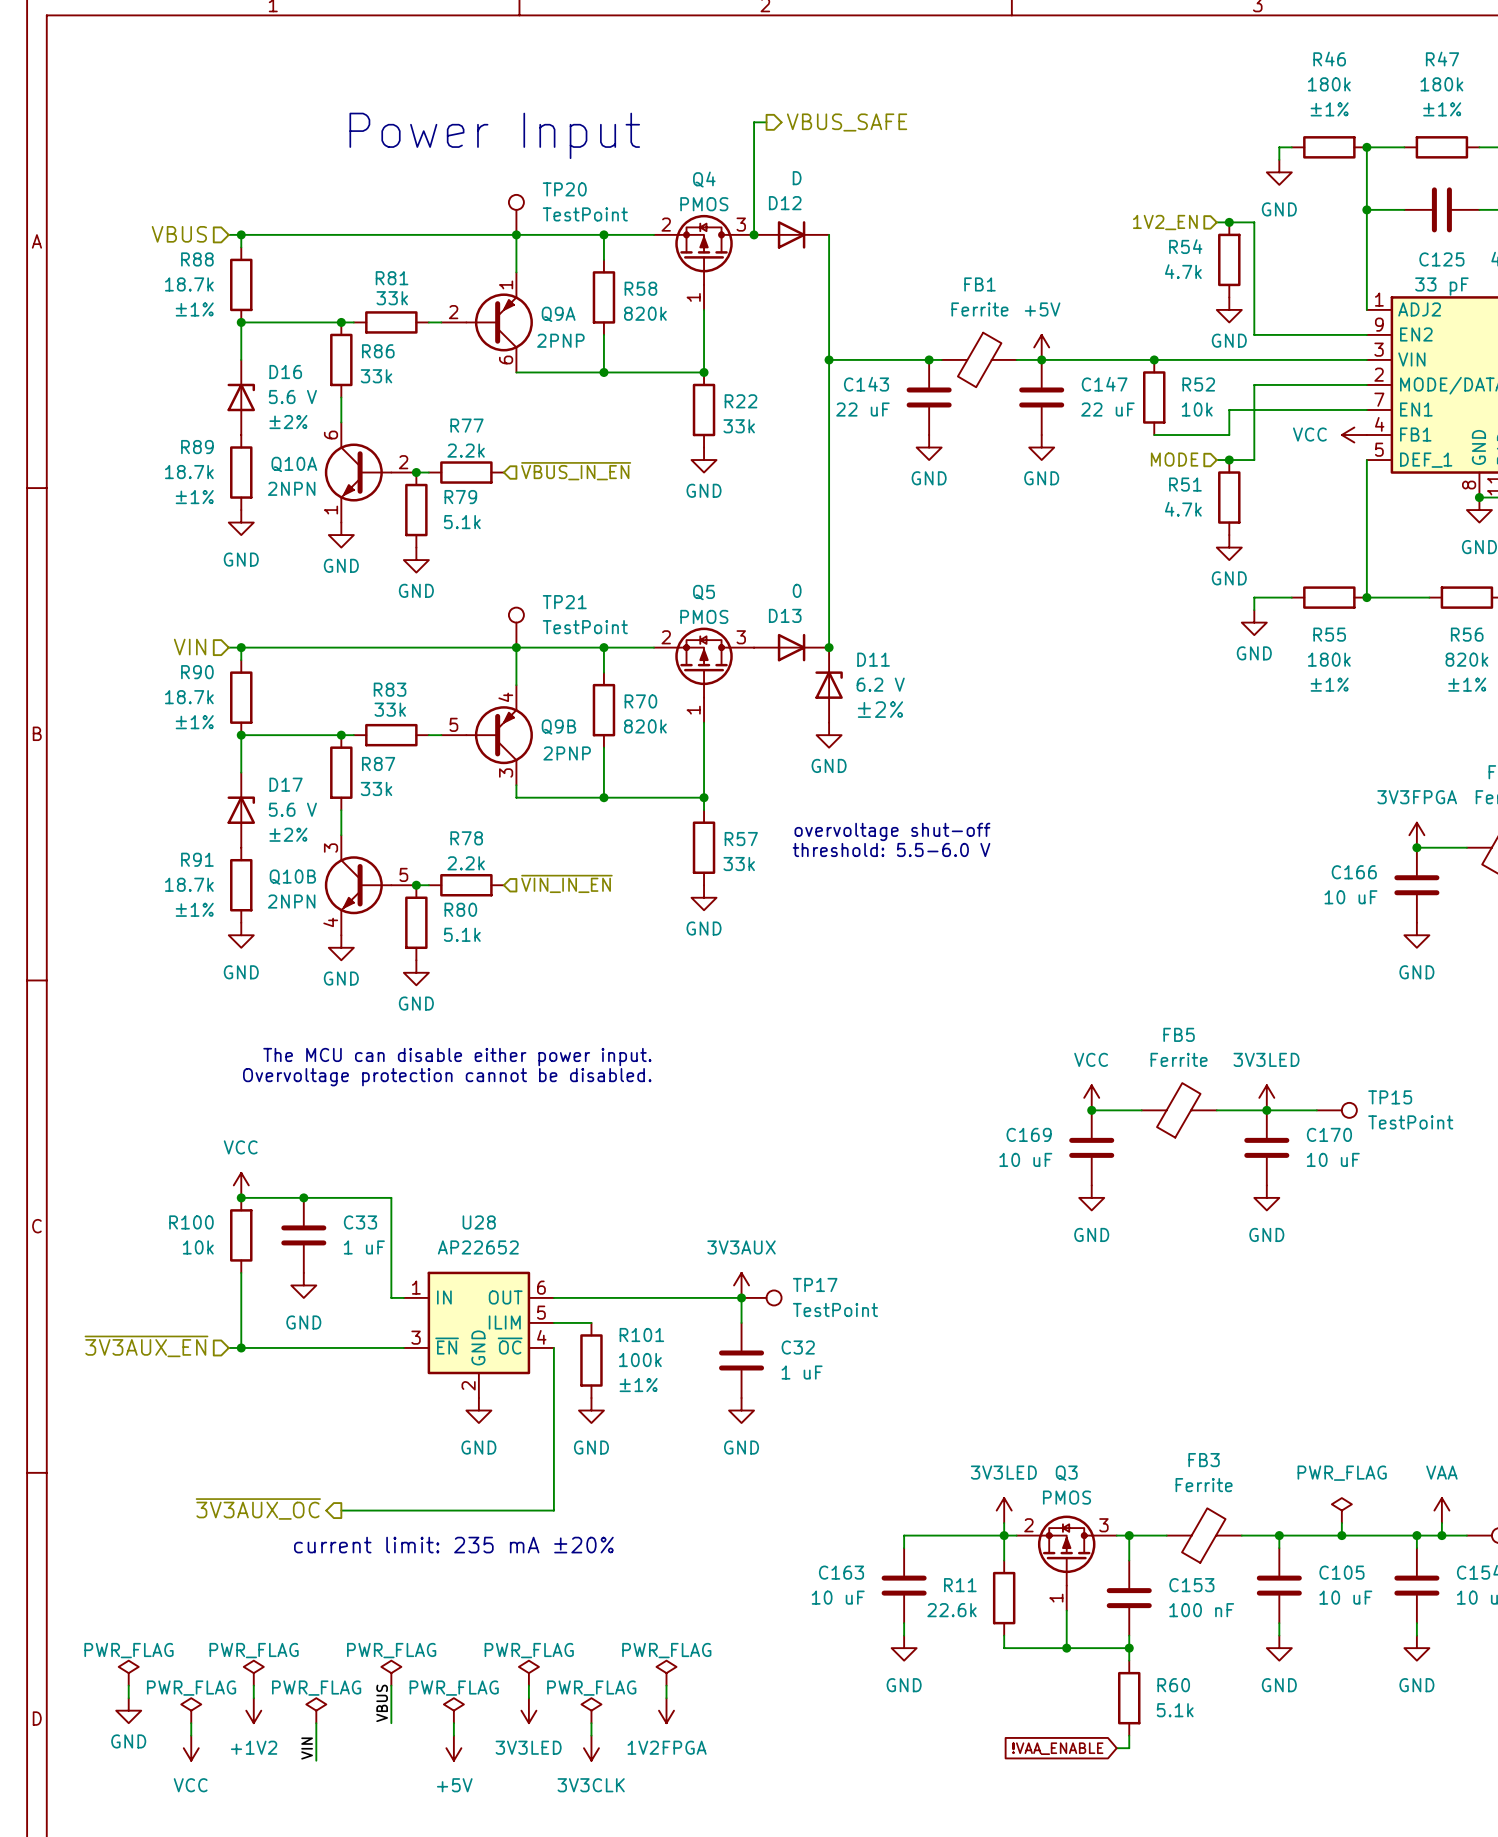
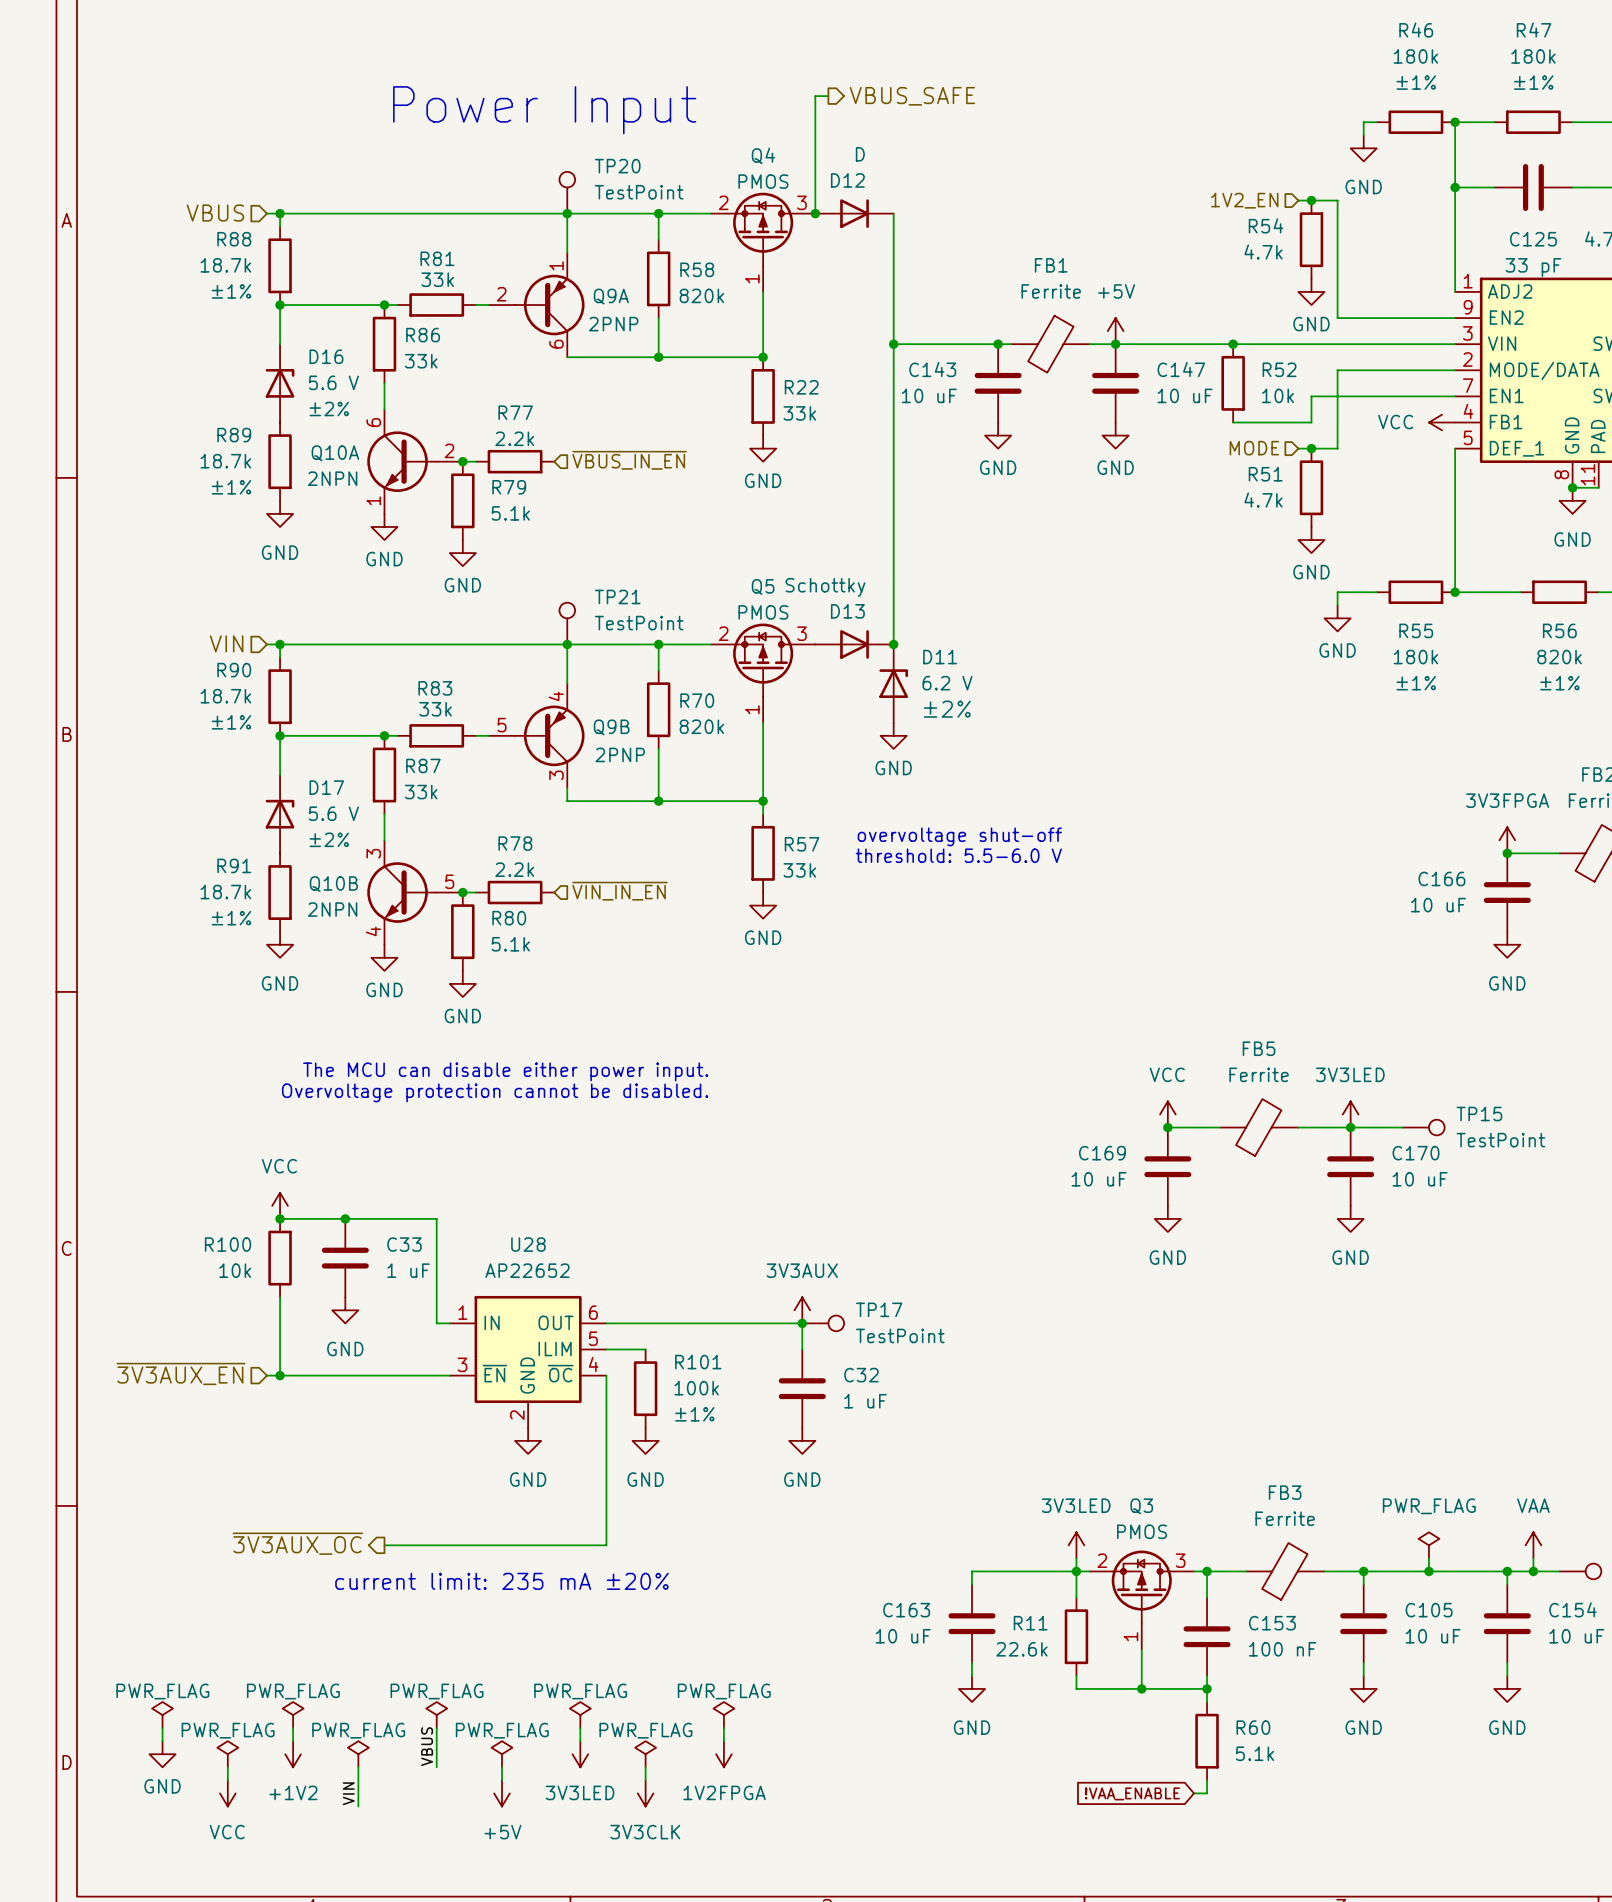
C143 value: 22 uF (862, 409) -> 10 uF (929, 395)
C147 value: 22 uF (1107, 409) -> 10 uF (1185, 395)
D13 value: 0 (797, 590) -> Schottky (825, 587)

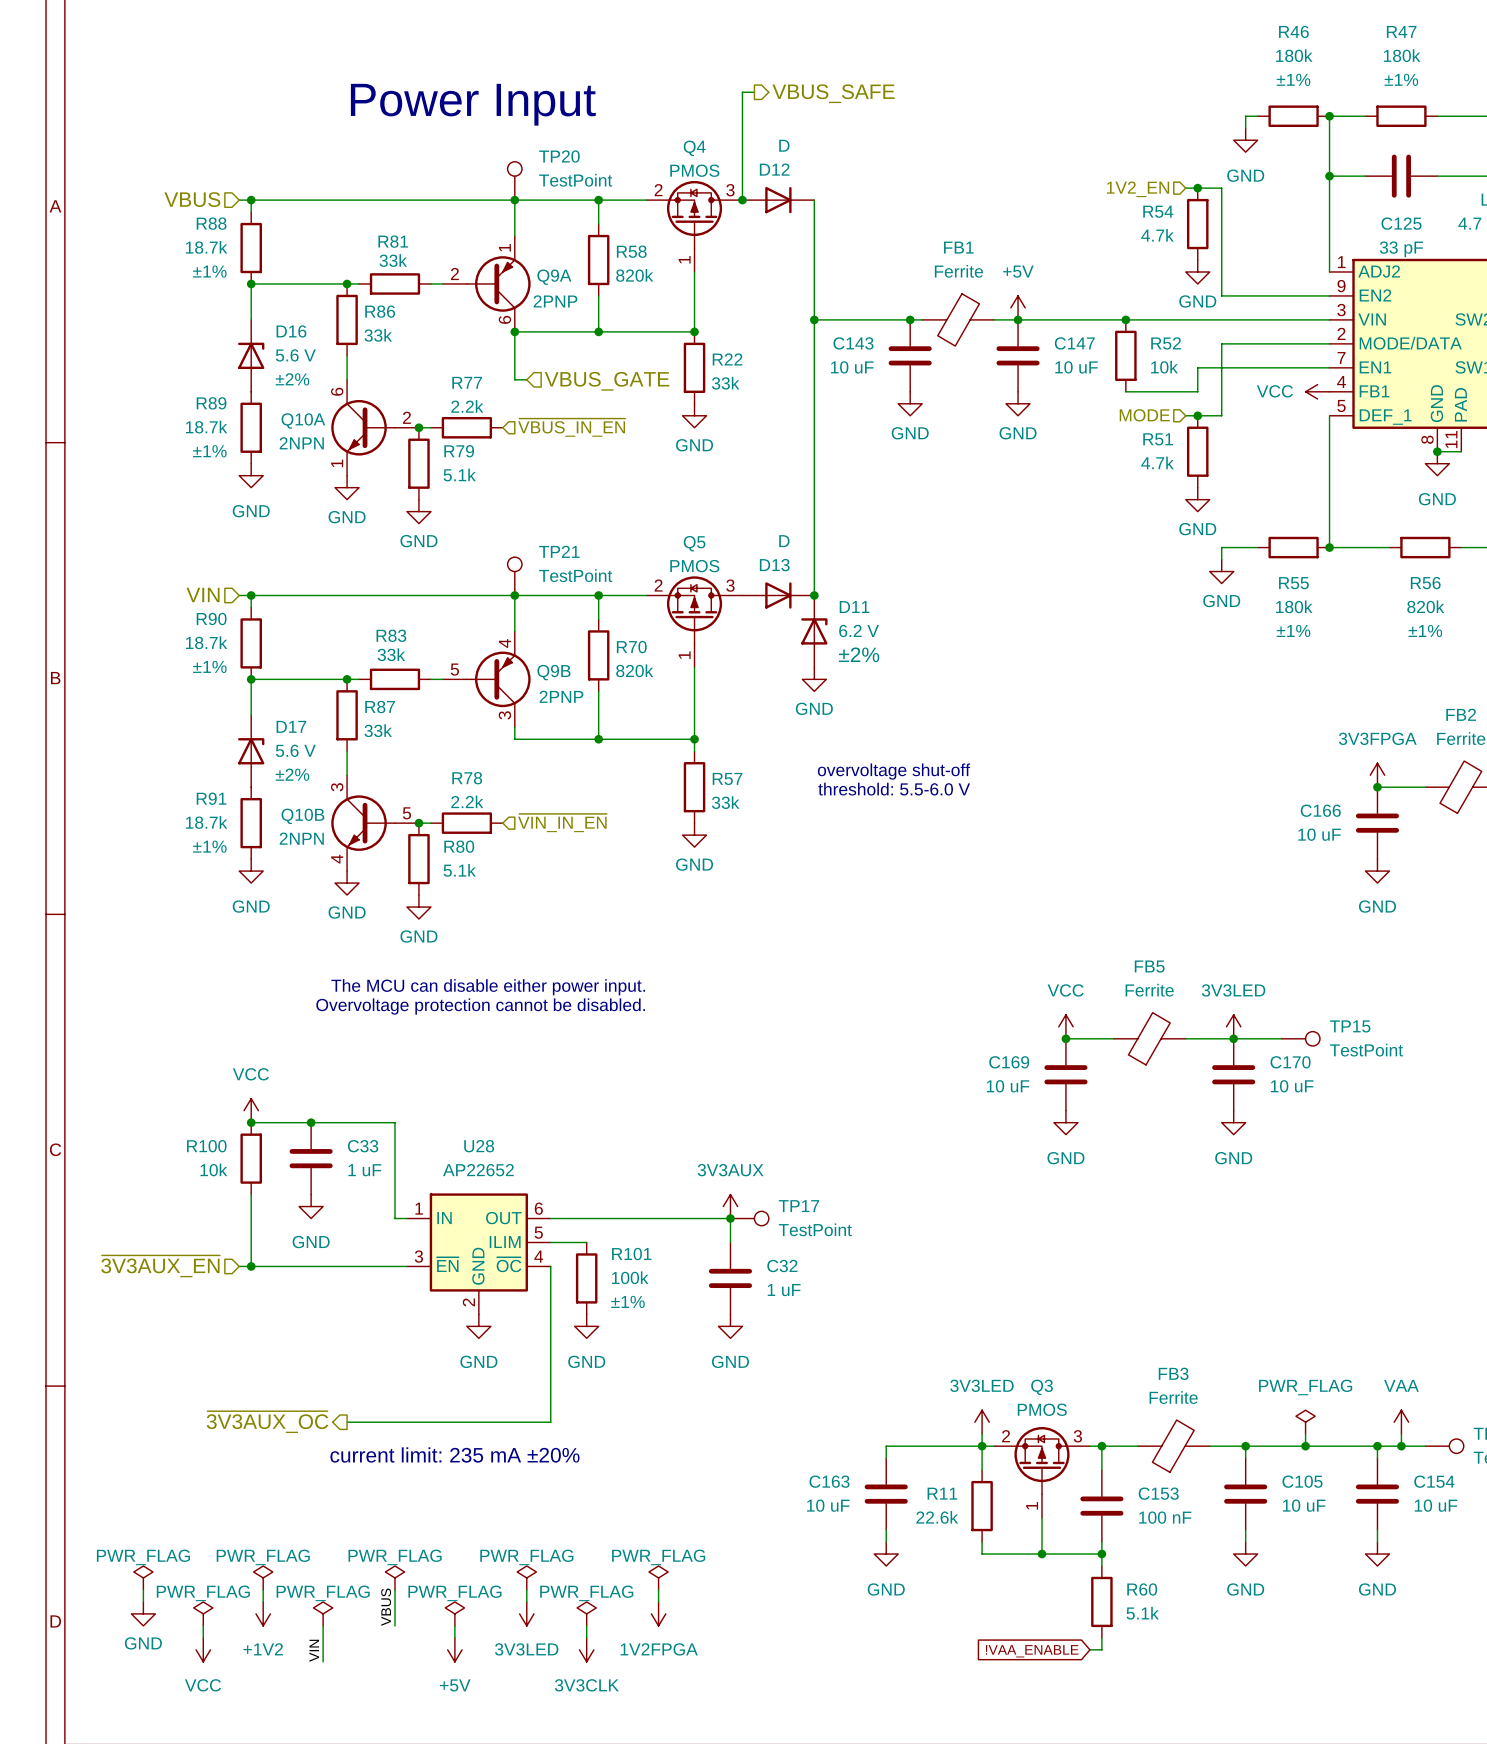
wire: none -> (514, 331) (514, 379) (526, 379)
junction: none -> (514, 331)
hierarchical label: none -> VBUS_GATE (607, 381)
D13 value: Schottky (825, 587) -> D (784, 541)

